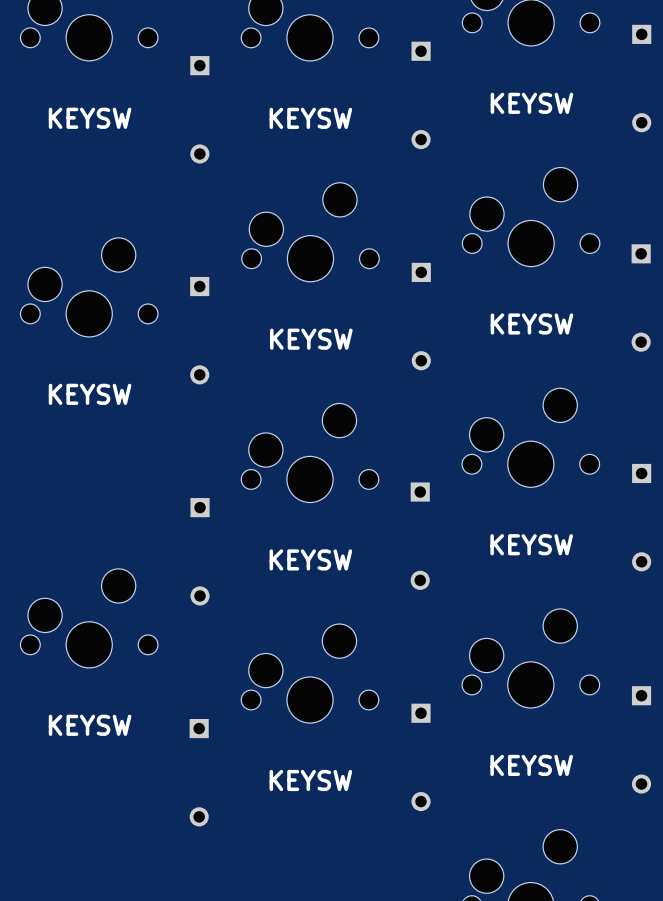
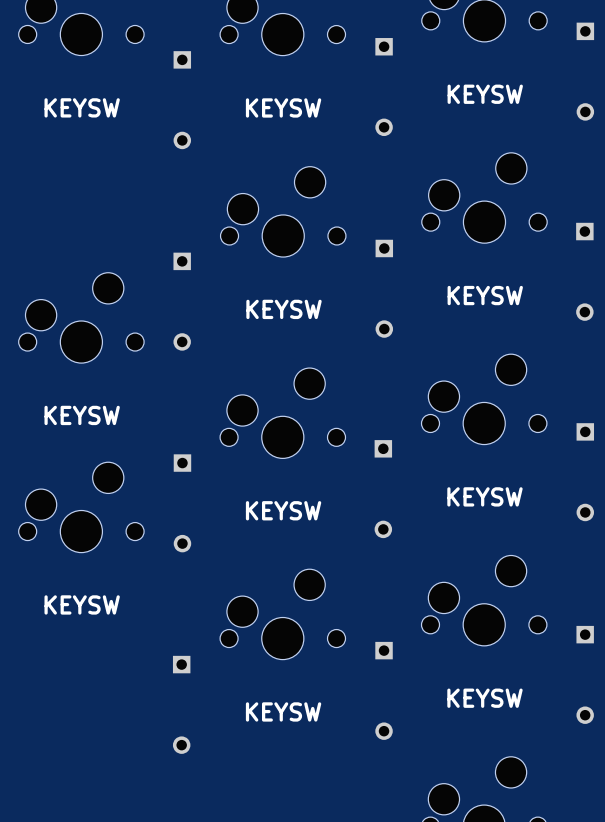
part position: (89, 287) -> (81, 317)
part position: (89, 618) -> (81, 507)

